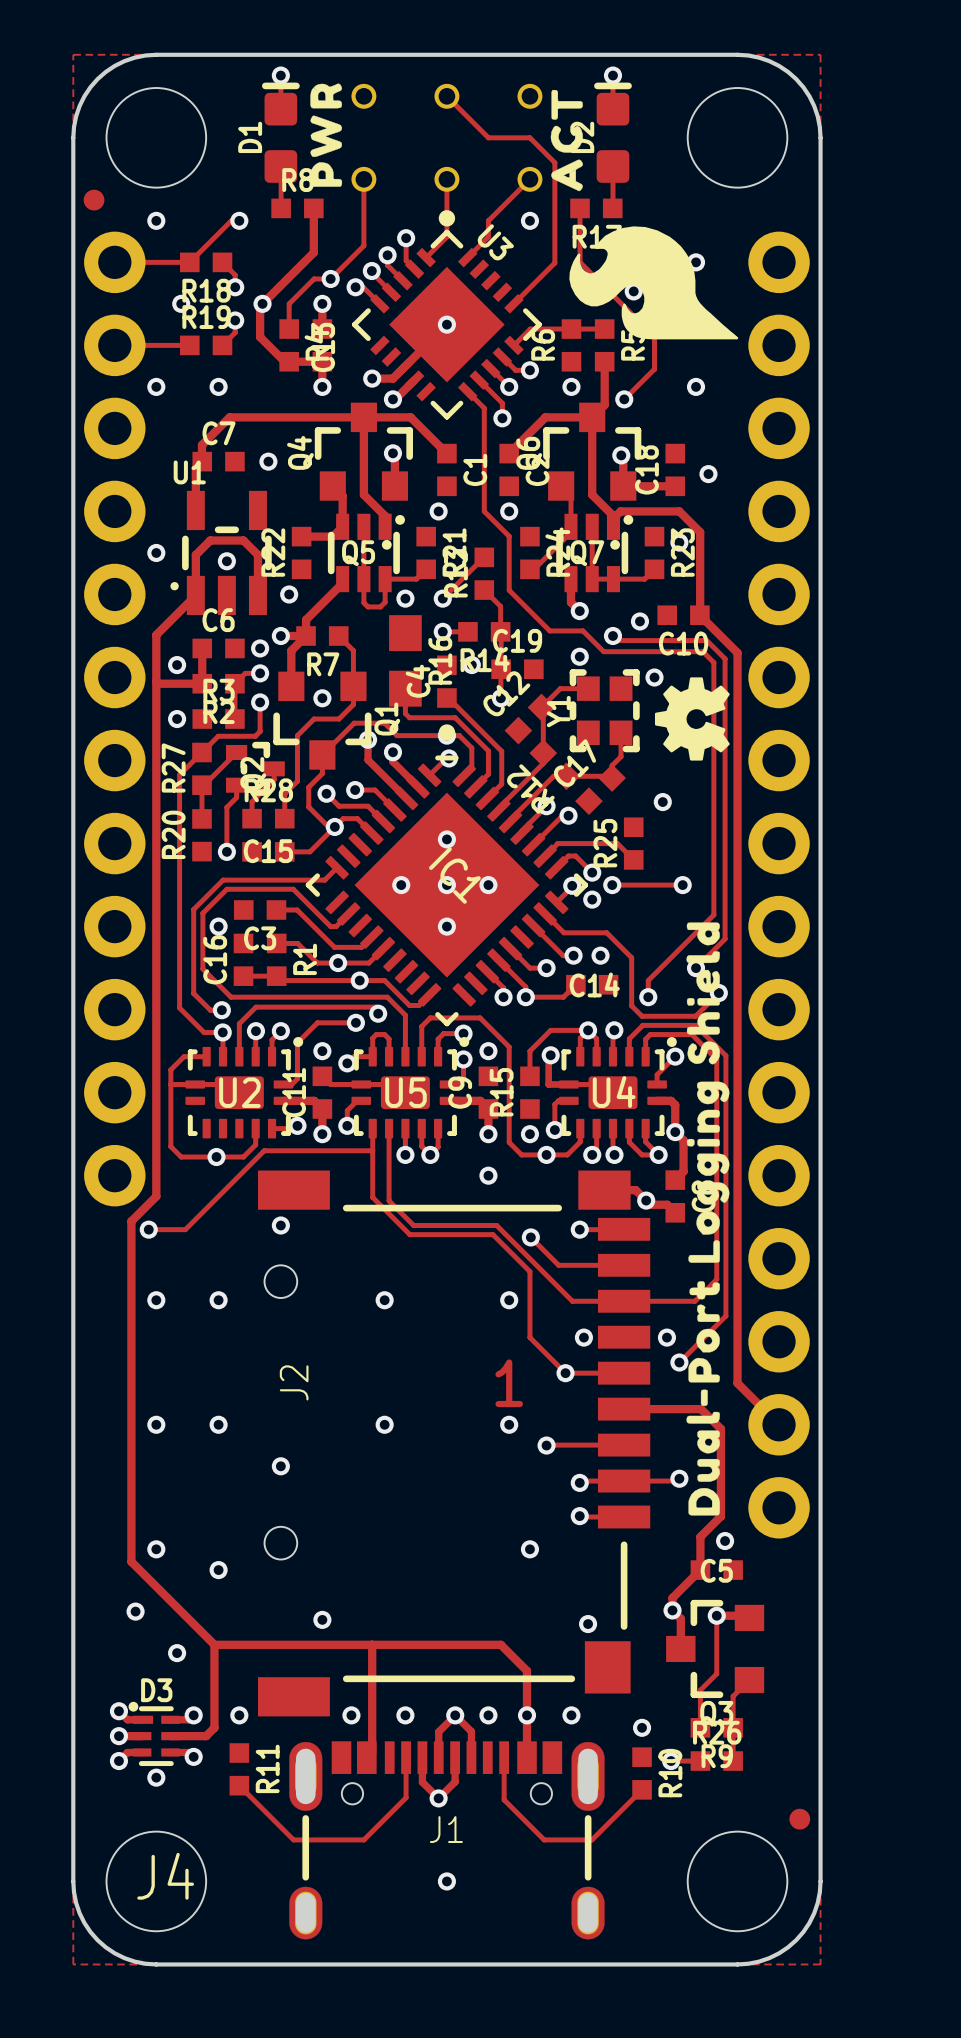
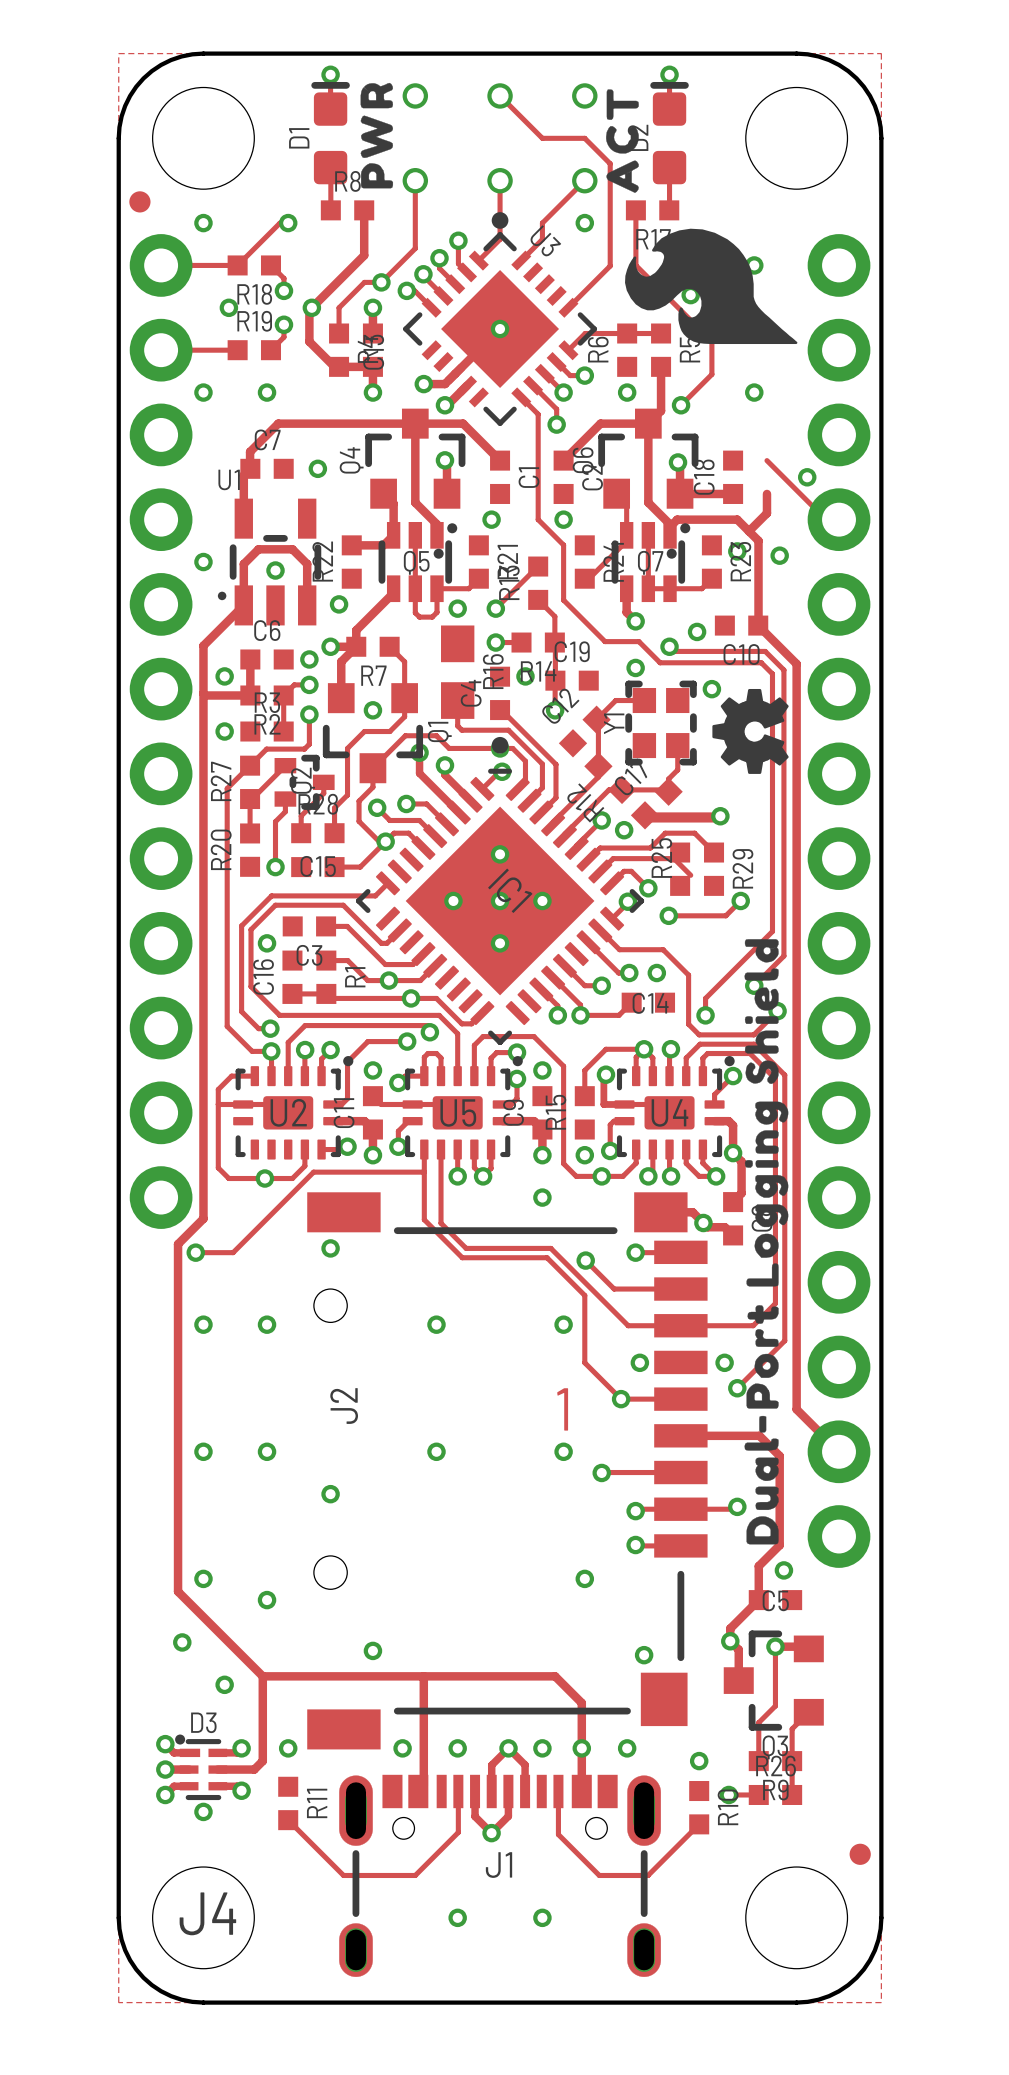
track: none -> (766, 460) (826, 519) (839, 519)
via: none -> (807, 477)
via: (708, 474) -> none
track: none -> (766, 493) (766, 513) (748, 531)
via: none -> (779, 555)
track: none -> (645, 815) (647, 817) (720, 816)
track: (568, 815) (562, 815) (545, 833) -> (714, 852) (694, 833) (665, 833) (650, 848) (600, 848)
R25 position: (633, 843) -> (680, 869)
R29: none -> (714, 869)
track: (612, 885) (682, 885) -> (668, 915) (725, 915) (740, 900)
via position: (612, 885) -> (668, 915)
via: (592, 899) -> none
via: none -> (457, 1917)
via: (446, 1881) -> none
via: none -> (542, 1917)

